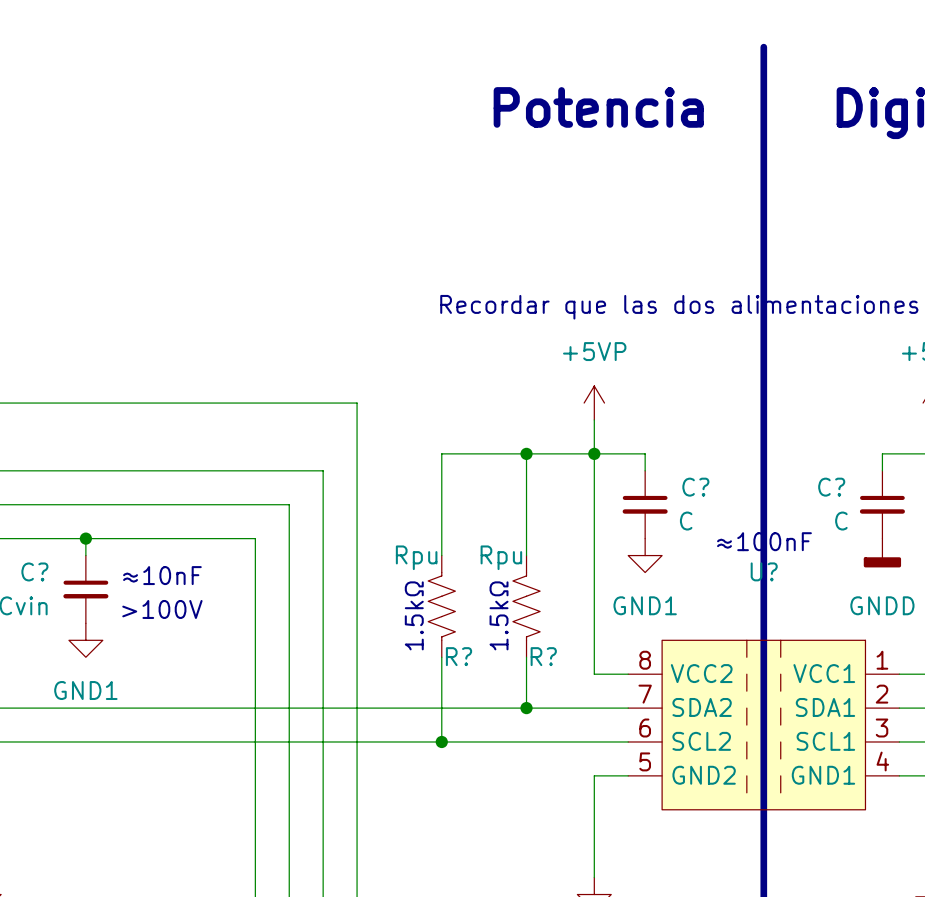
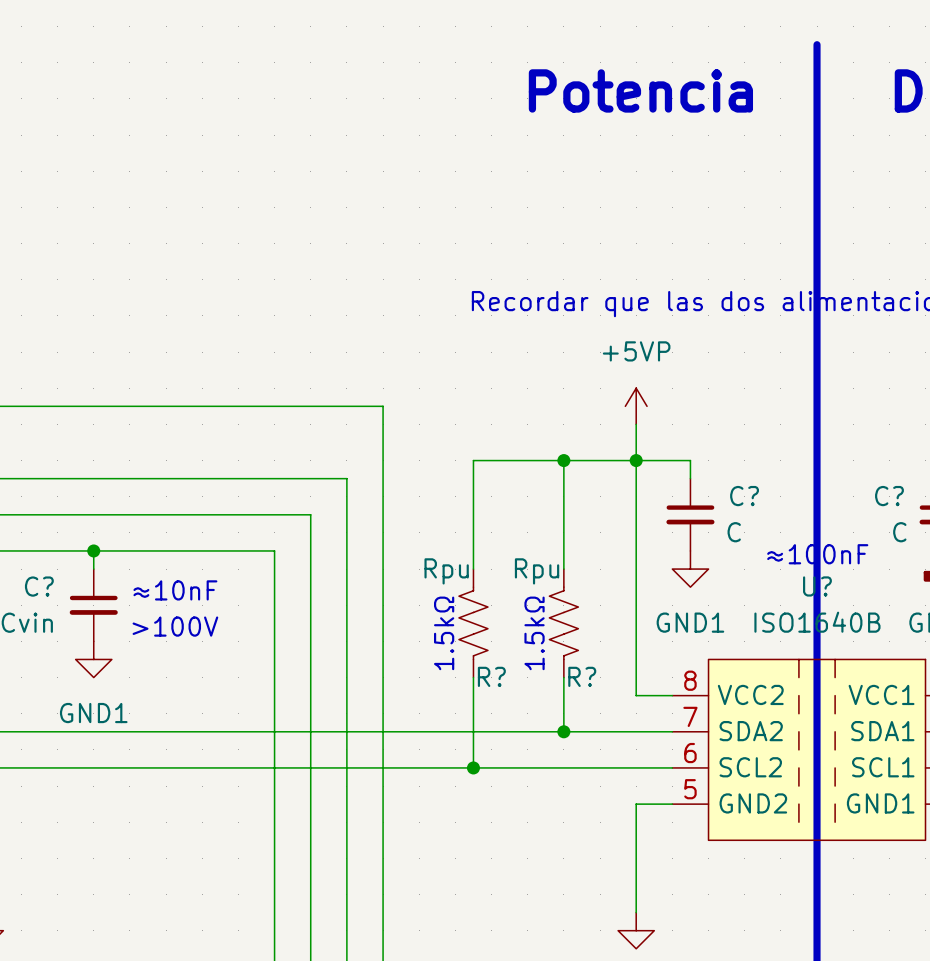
line: (763, 47) (763, 64) -> none
U? value: none -> ISO1640B (817, 622)

